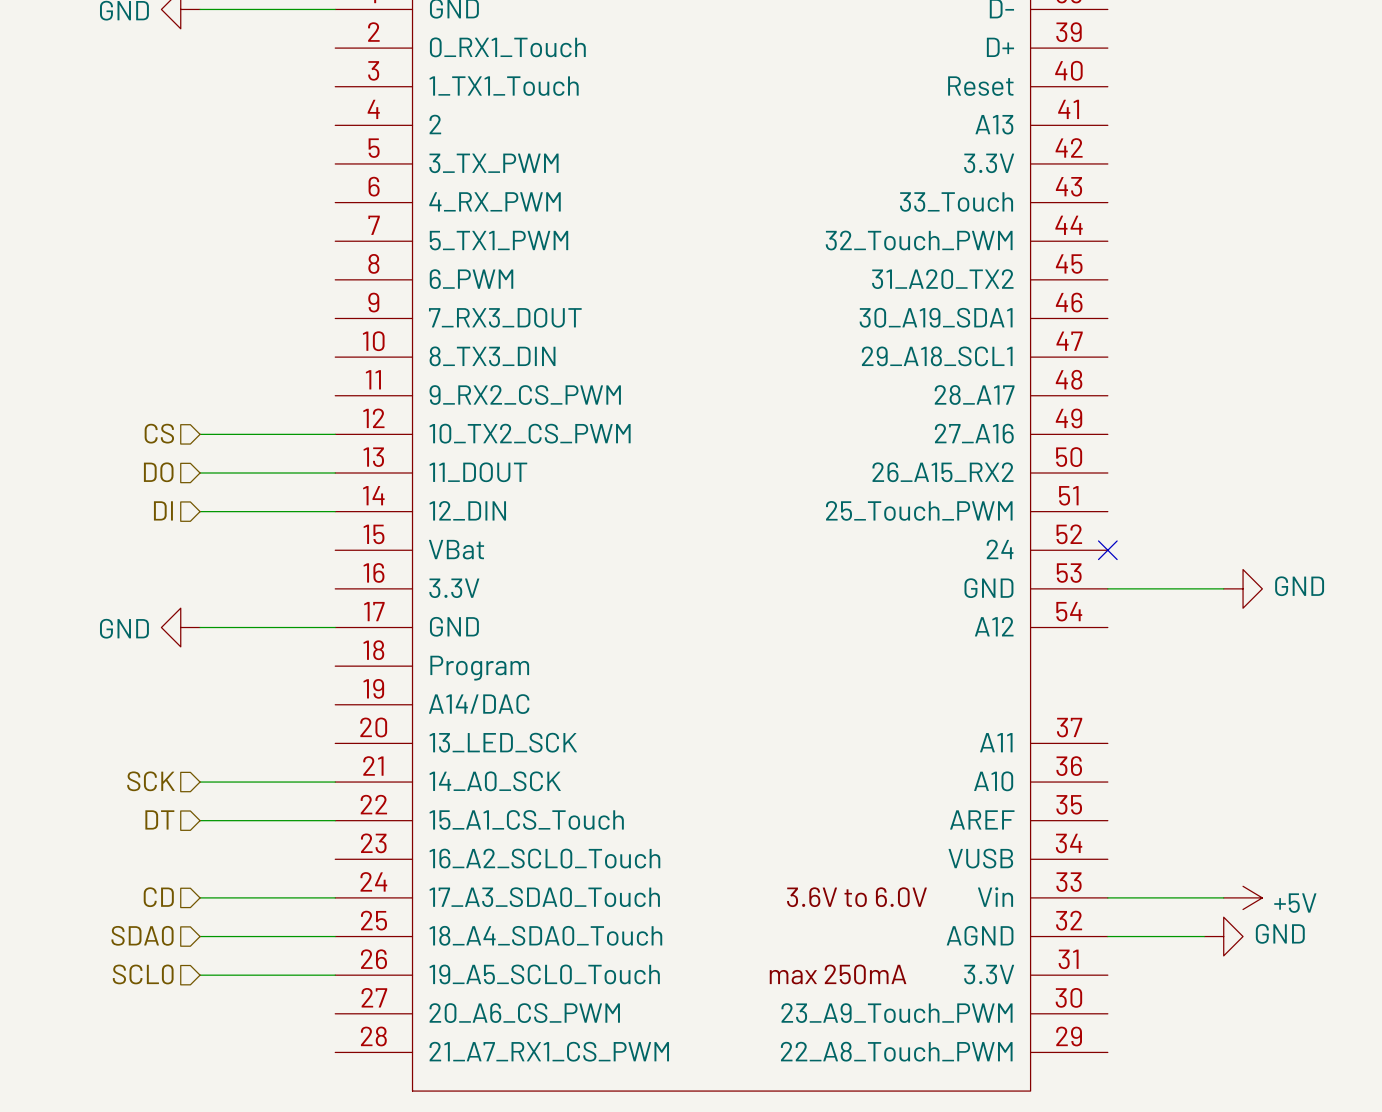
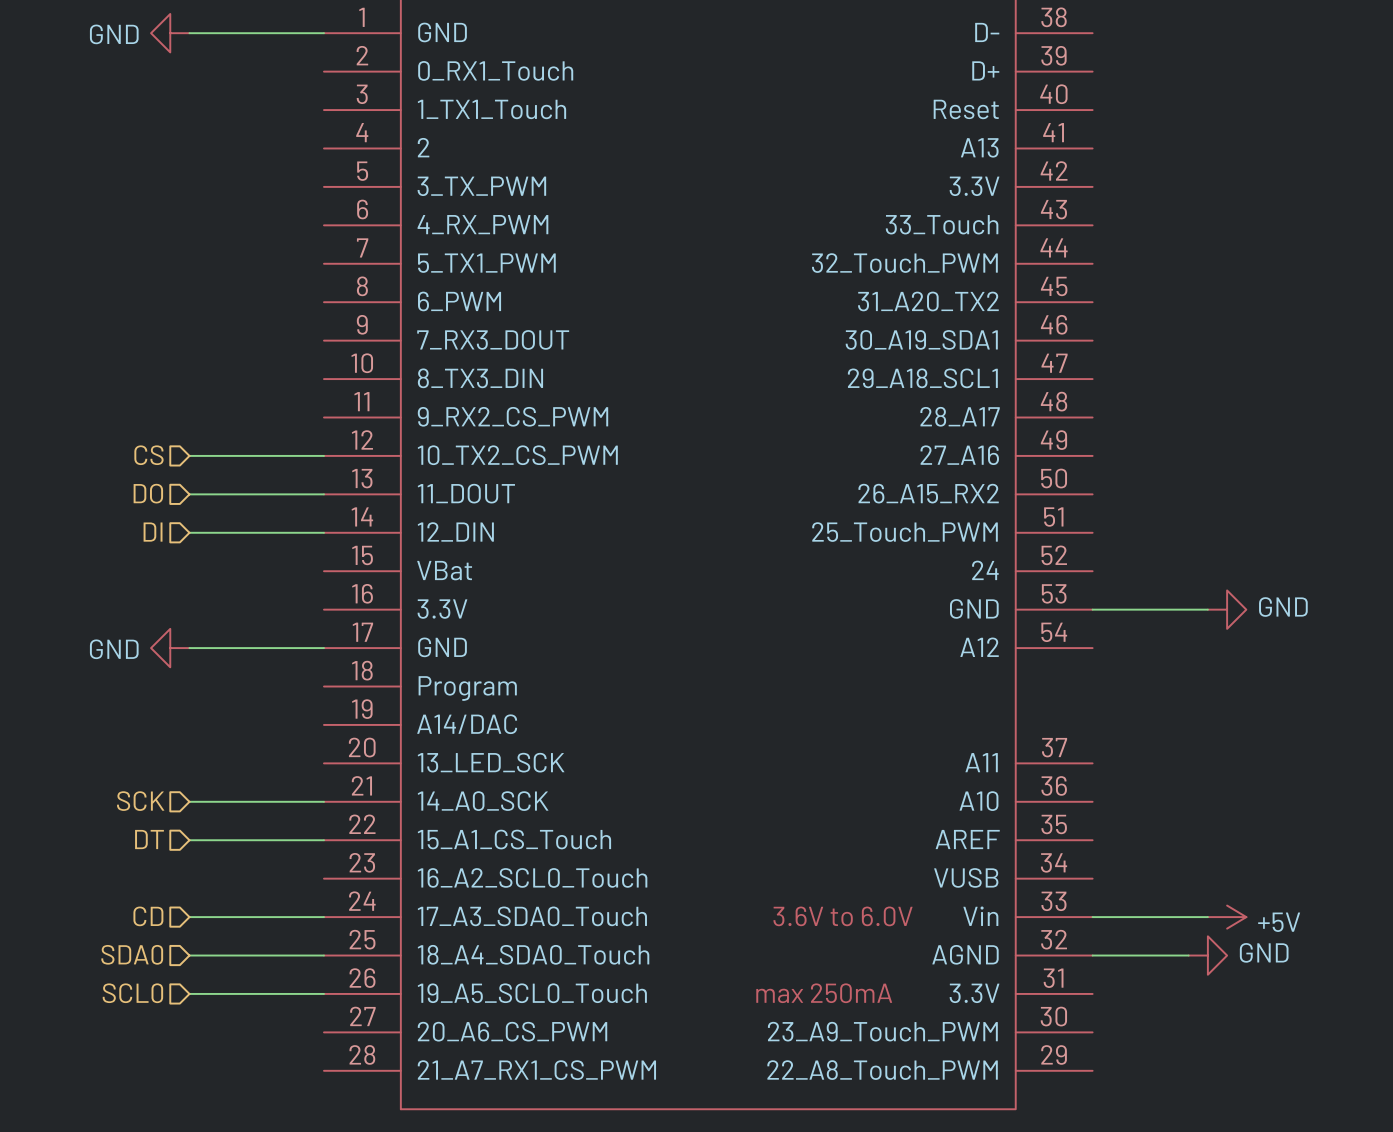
no-connect mark: (1107, 550) -> none

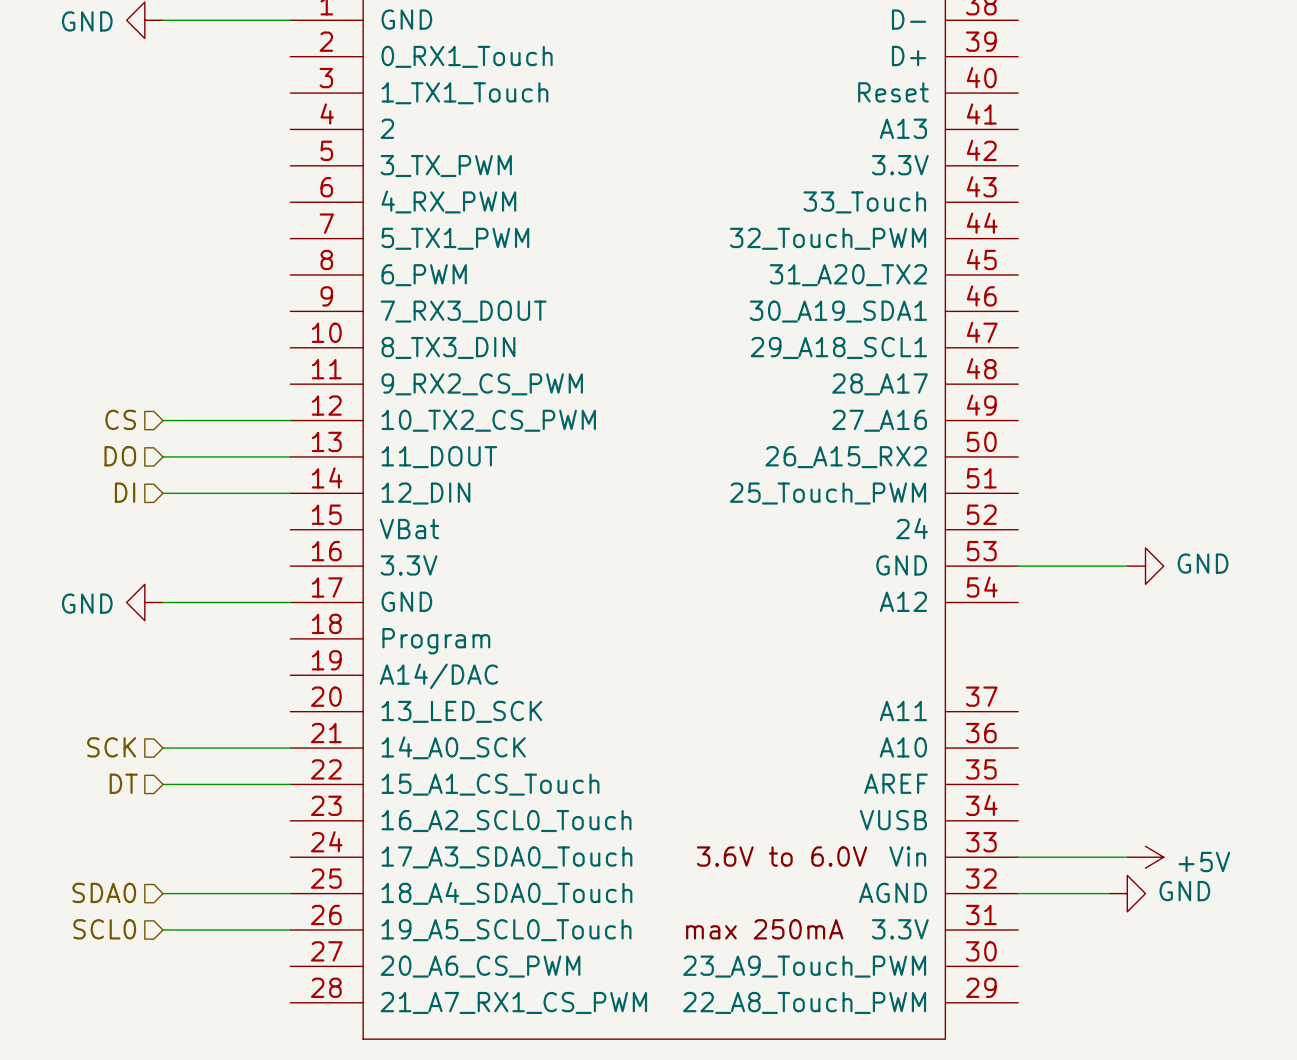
hierarchical label: CD (148, 916) -> none
wire: (189, 917) (323, 917) -> none

